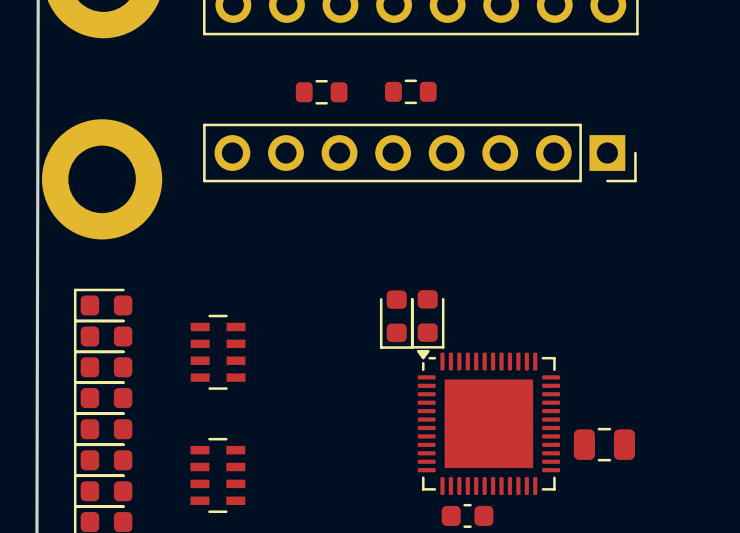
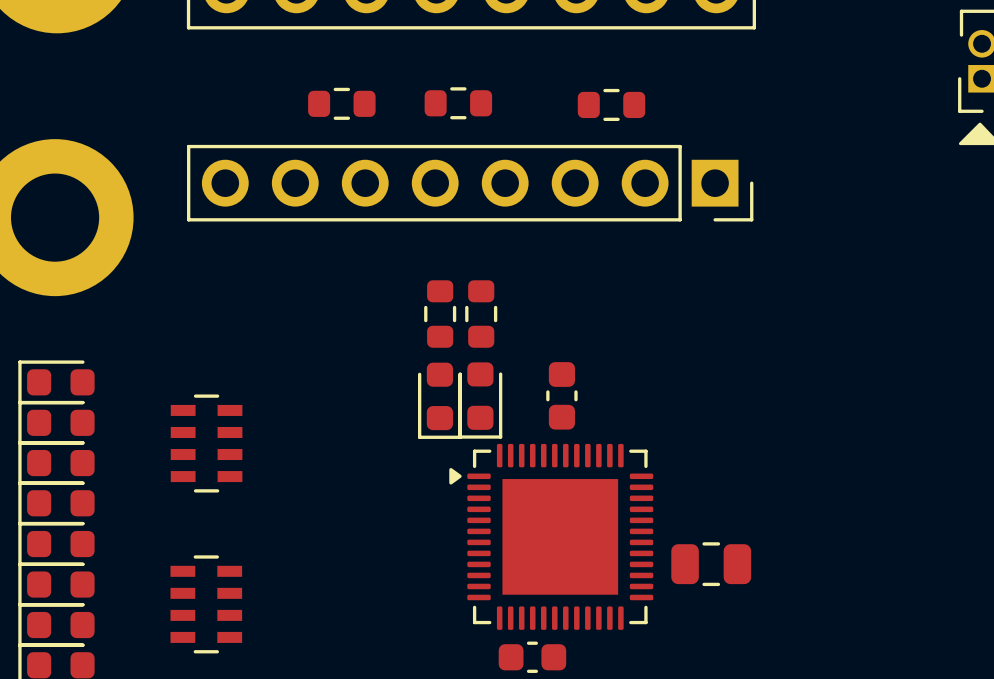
part: none -> (611, 104)
part: none -> (440, 314)
part: none -> (481, 314)
part: none -> (561, 395)
part footprint: [416, 349, 561, 495] -> [449, 443, 654, 630]

